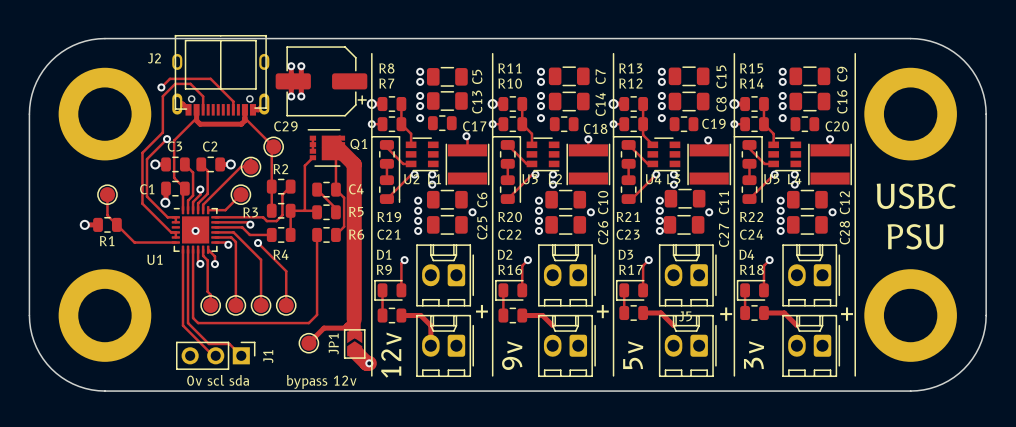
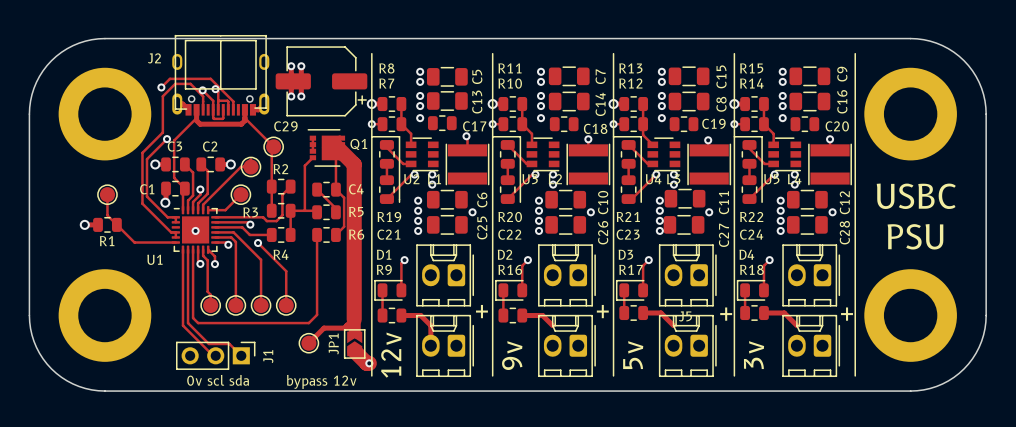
track: none -> (215, 89) (218, 91) (218, 109)
via: none -> (215, 89)
track: none -> (202, 90) (213, 100) (213, 118) (222, 118) (223, 109)
via: none -> (202, 90)
track: none -> (218, 101) (227, 100) (228, 109)

